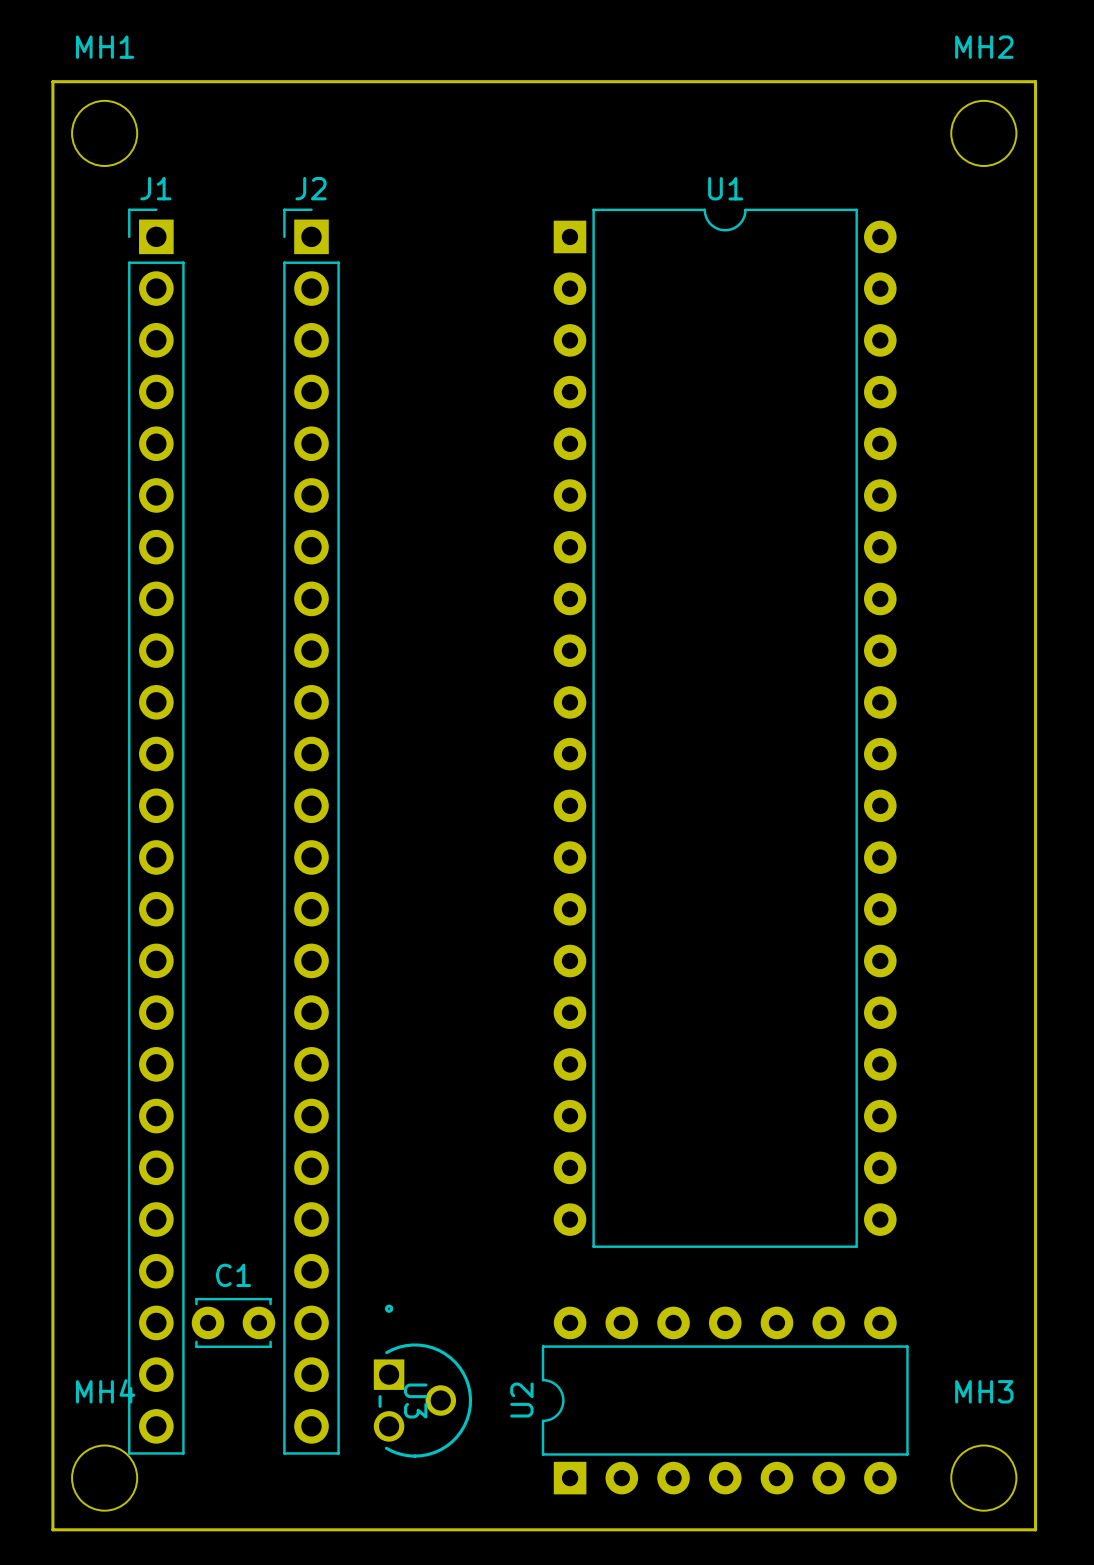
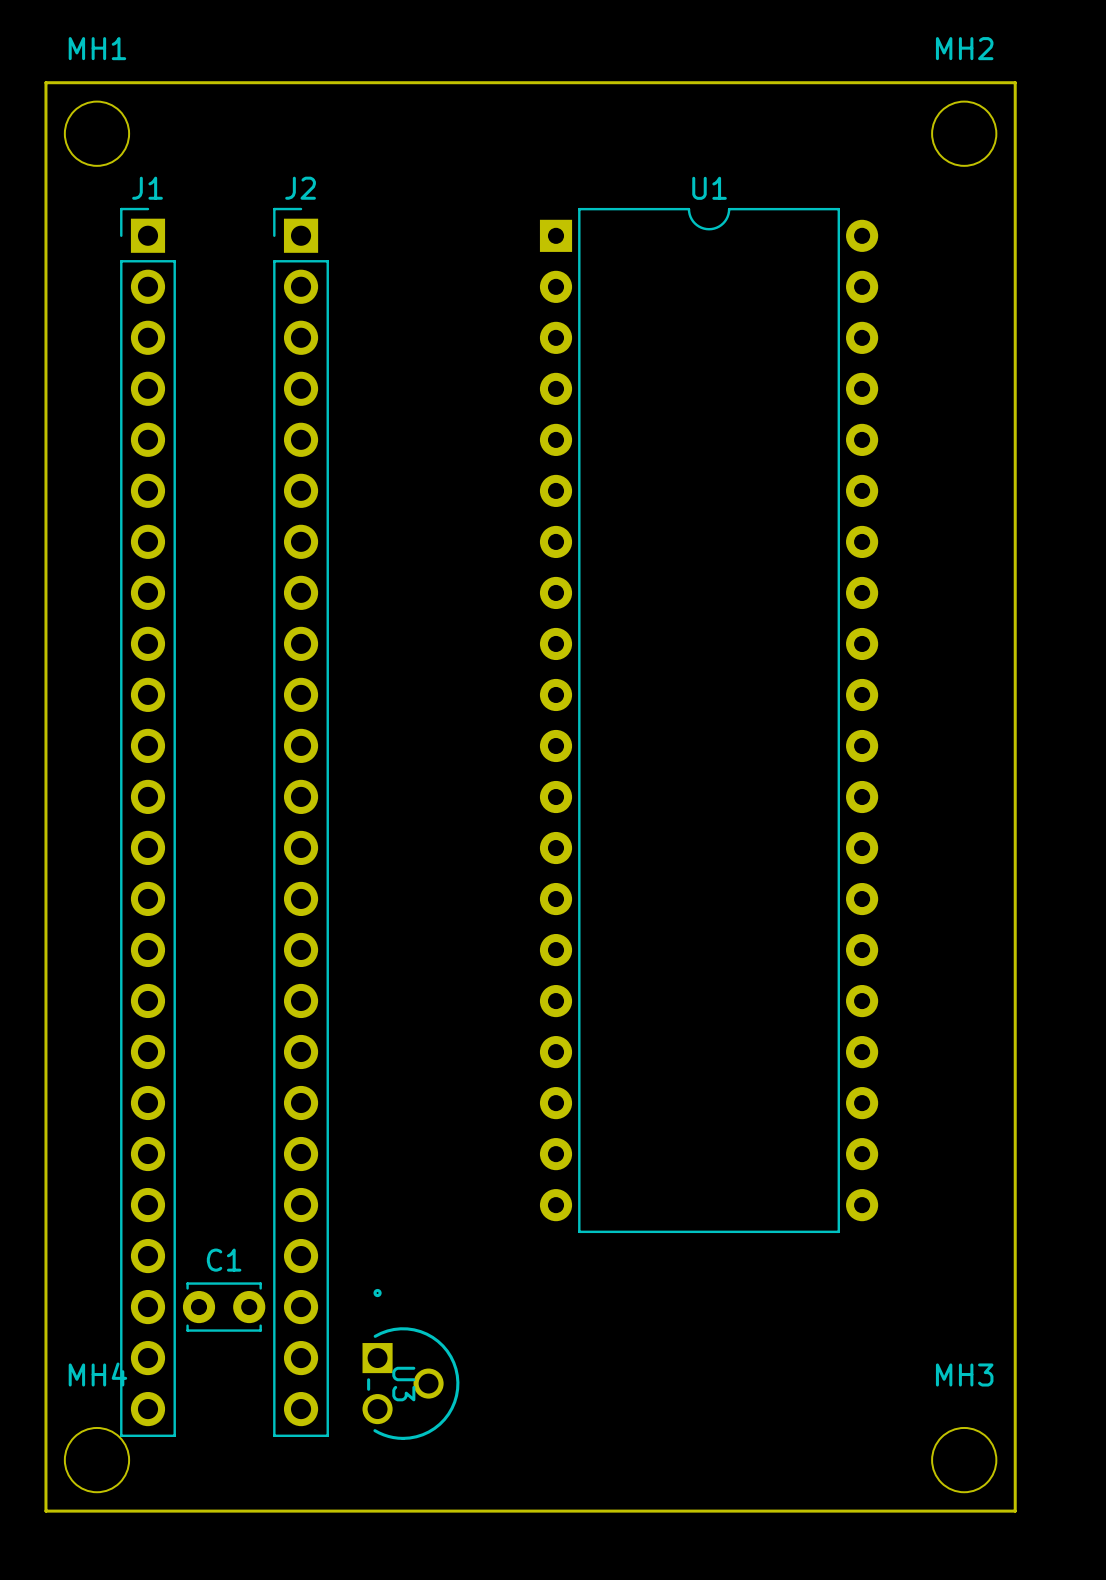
U2: (725, 1400) -> none

